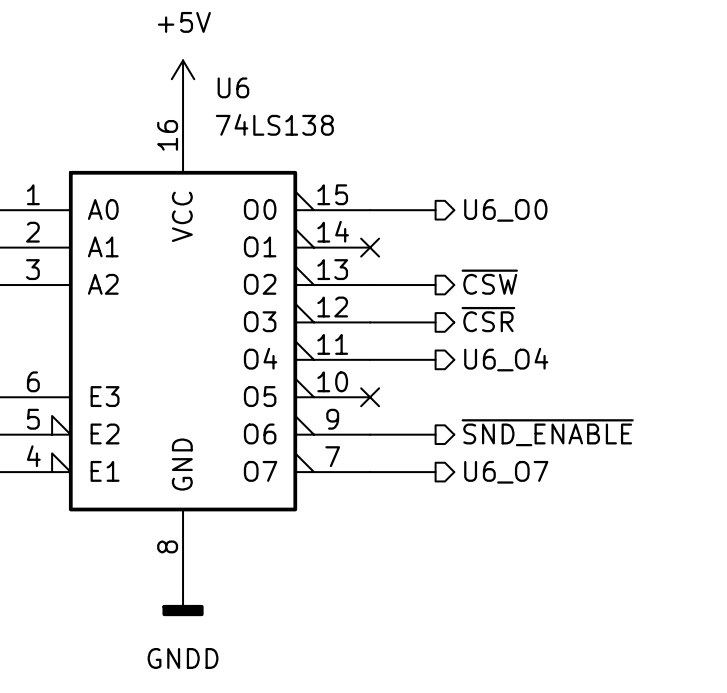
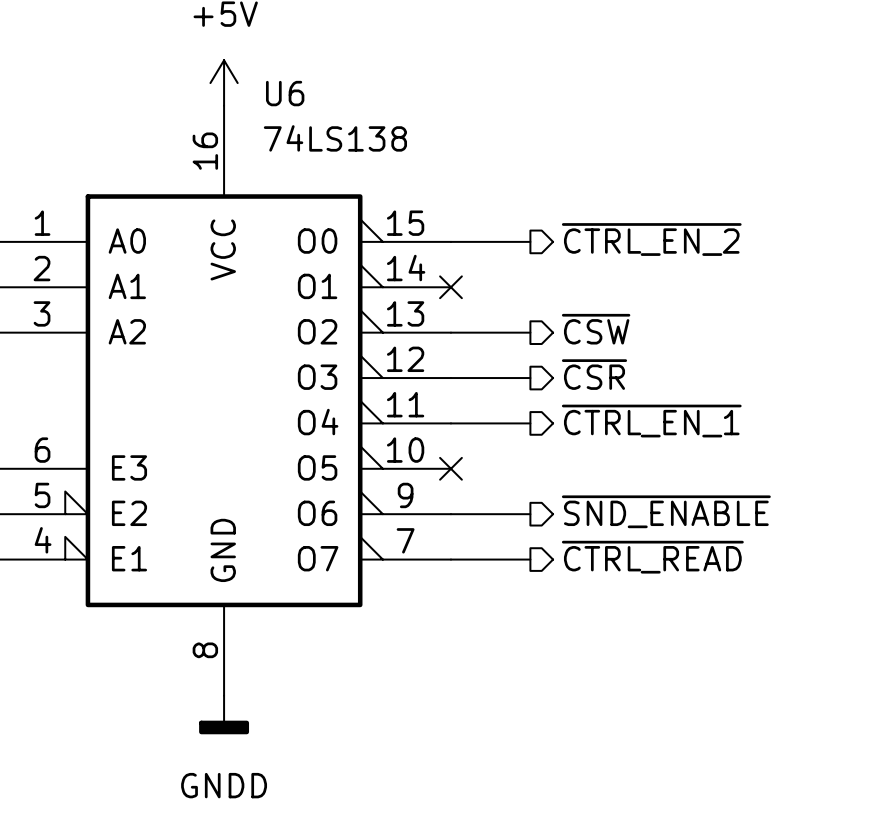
hierarchical label: U6_O0 (505, 210) -> ~{CTRL_EN_2} (651, 239)
hierarchical label: U6_O4 (506, 359) -> ~{CTRL_EN_1} (651, 421)
hierarchical label: U6_O7 (506, 472) -> ~{CTRL_READ} (652, 557)

